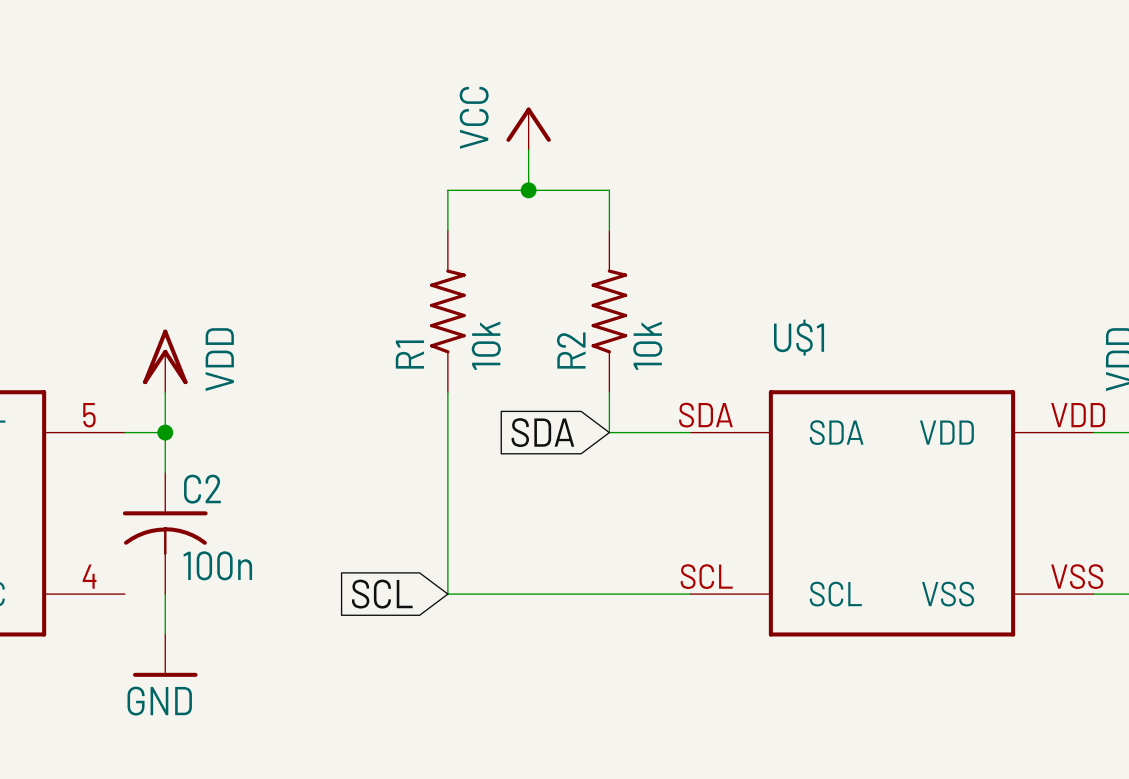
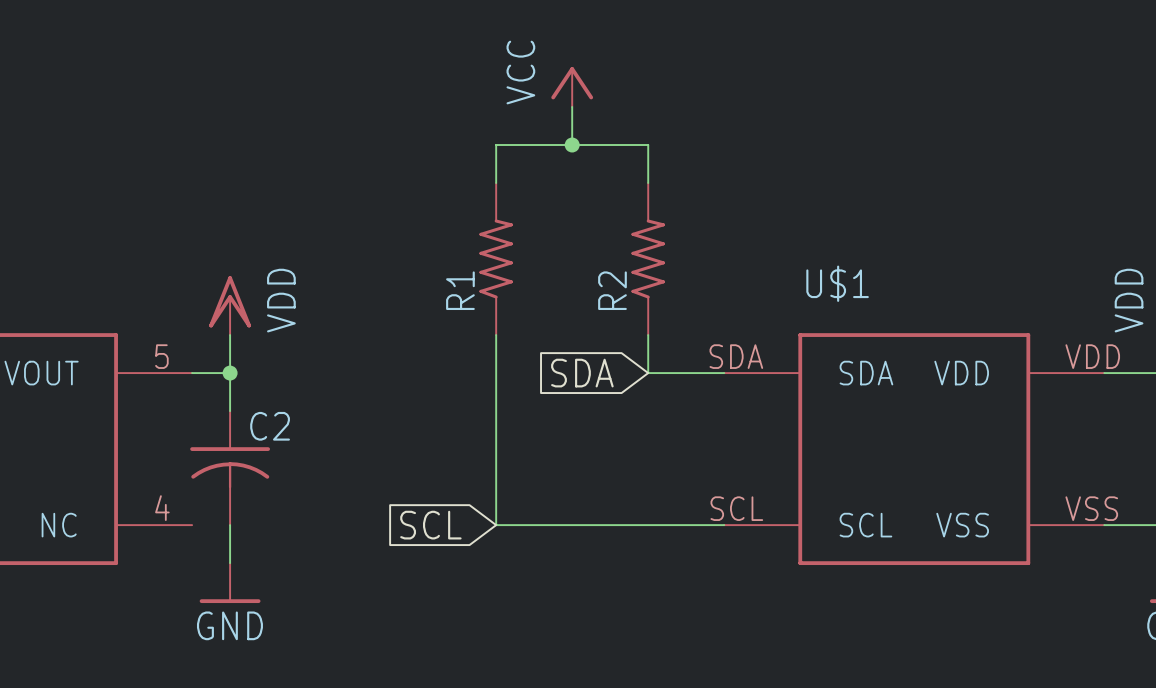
R1 value: 10k (486, 345) -> none
R2 value: 10k (647, 345) -> none
C2 value: 100n (217, 565) -> none

